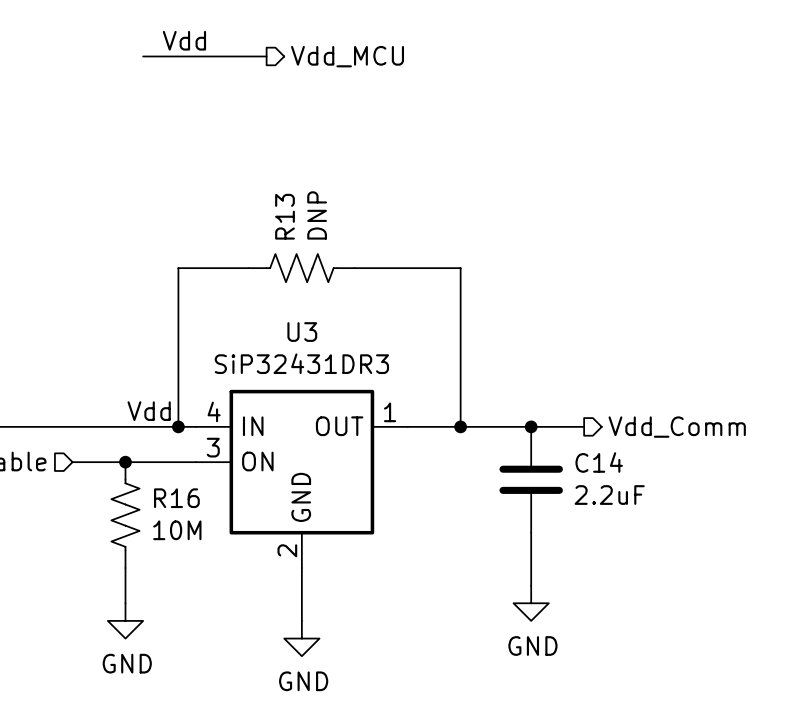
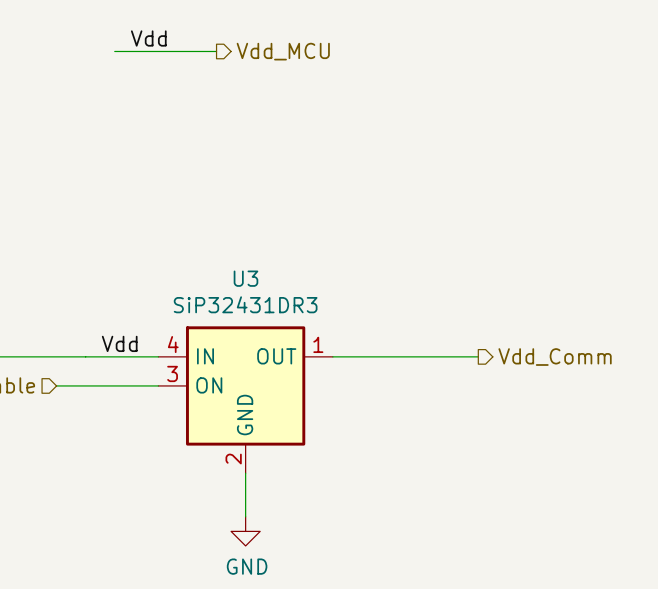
wire: (248, 268) (178, 268) (178, 426) -> none
R13: DNP (301, 268) -> none
wire: (354, 268) (460, 268) (460, 426) -> none
junction: (178, 426) -> none
junction: (460, 426) -> none
junction: (531, 426) -> none
junction: (125, 462) -> none
C14: 2.2uF (531, 479) -> none
R16: 10M (125, 515) -> none
wire: (531, 532) (531, 585) -> none
wire: (125, 568) (125, 603) -> none
power symbol: GND (531, 603) -> none
power symbol: GND (125, 620) -> none

